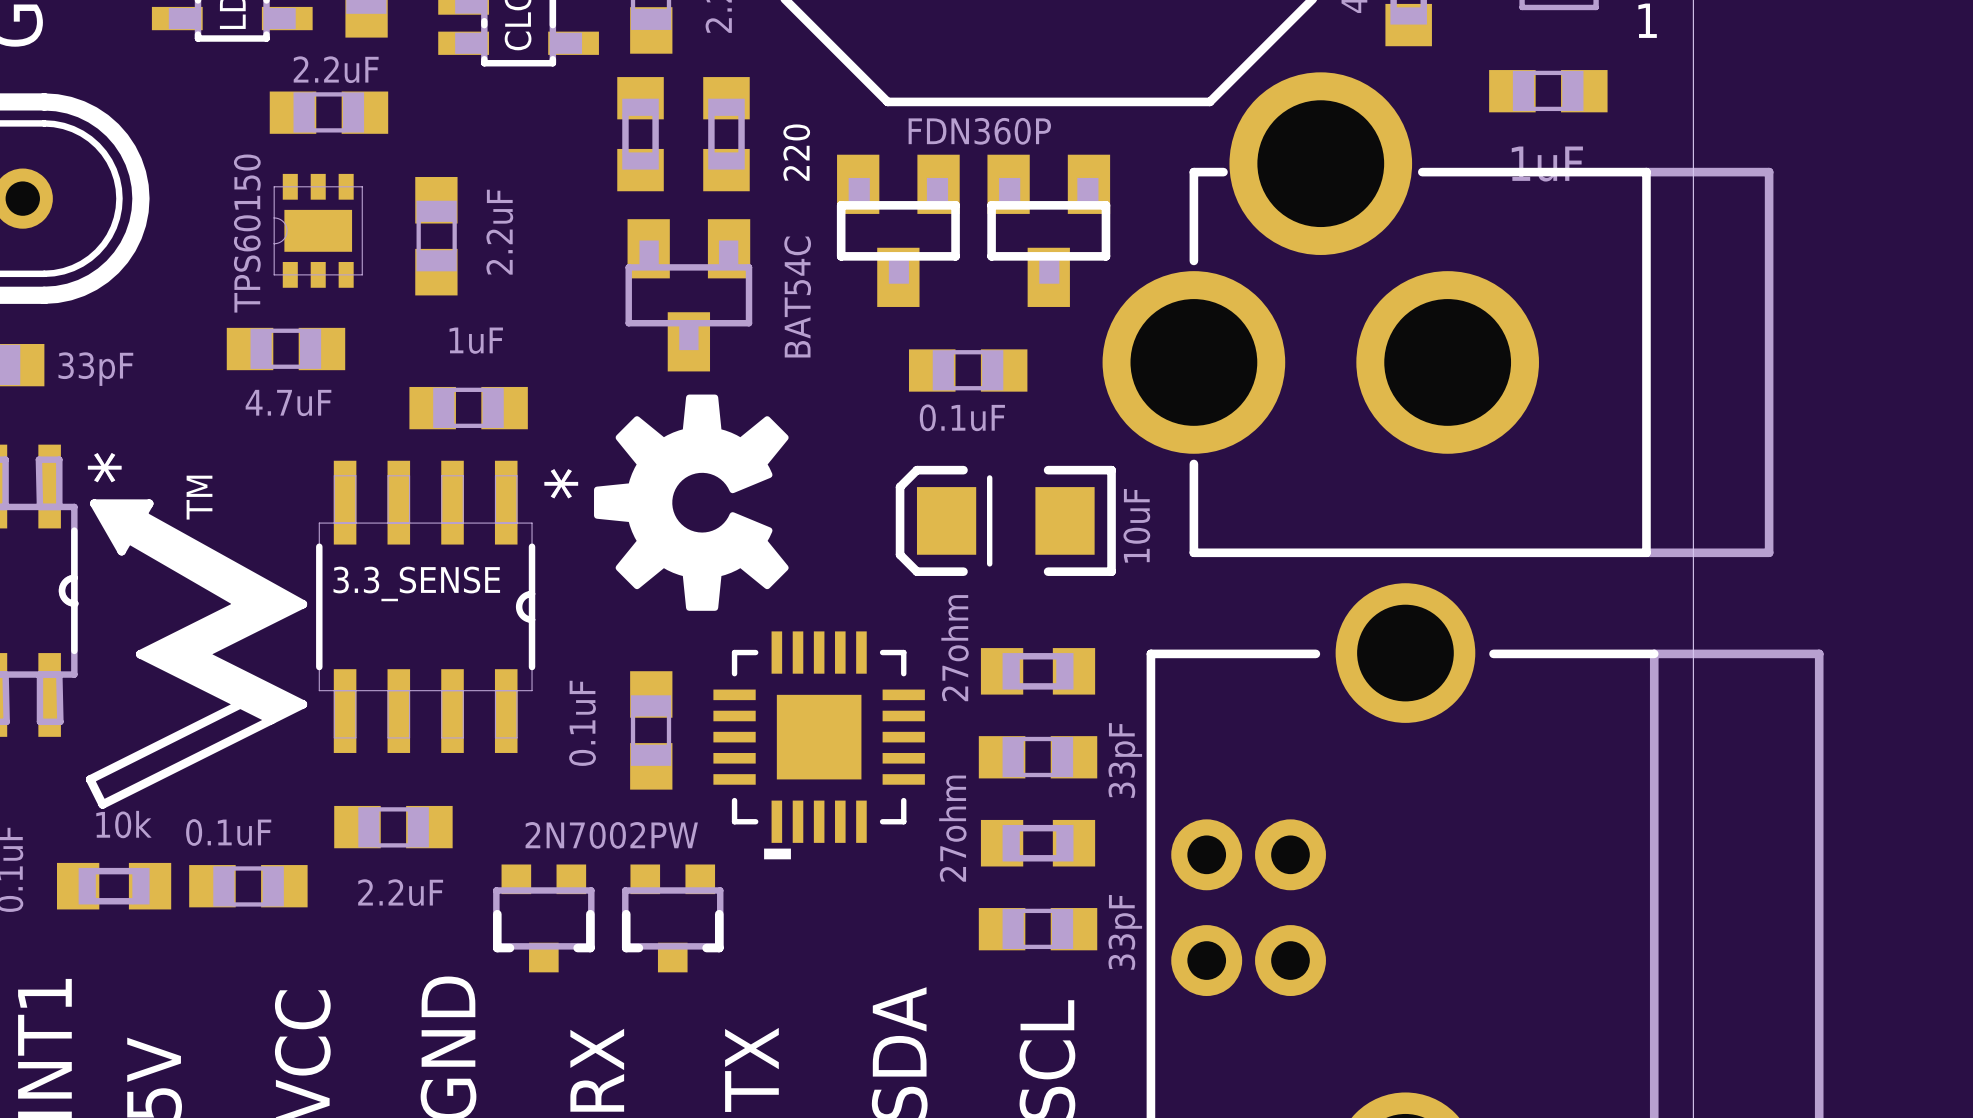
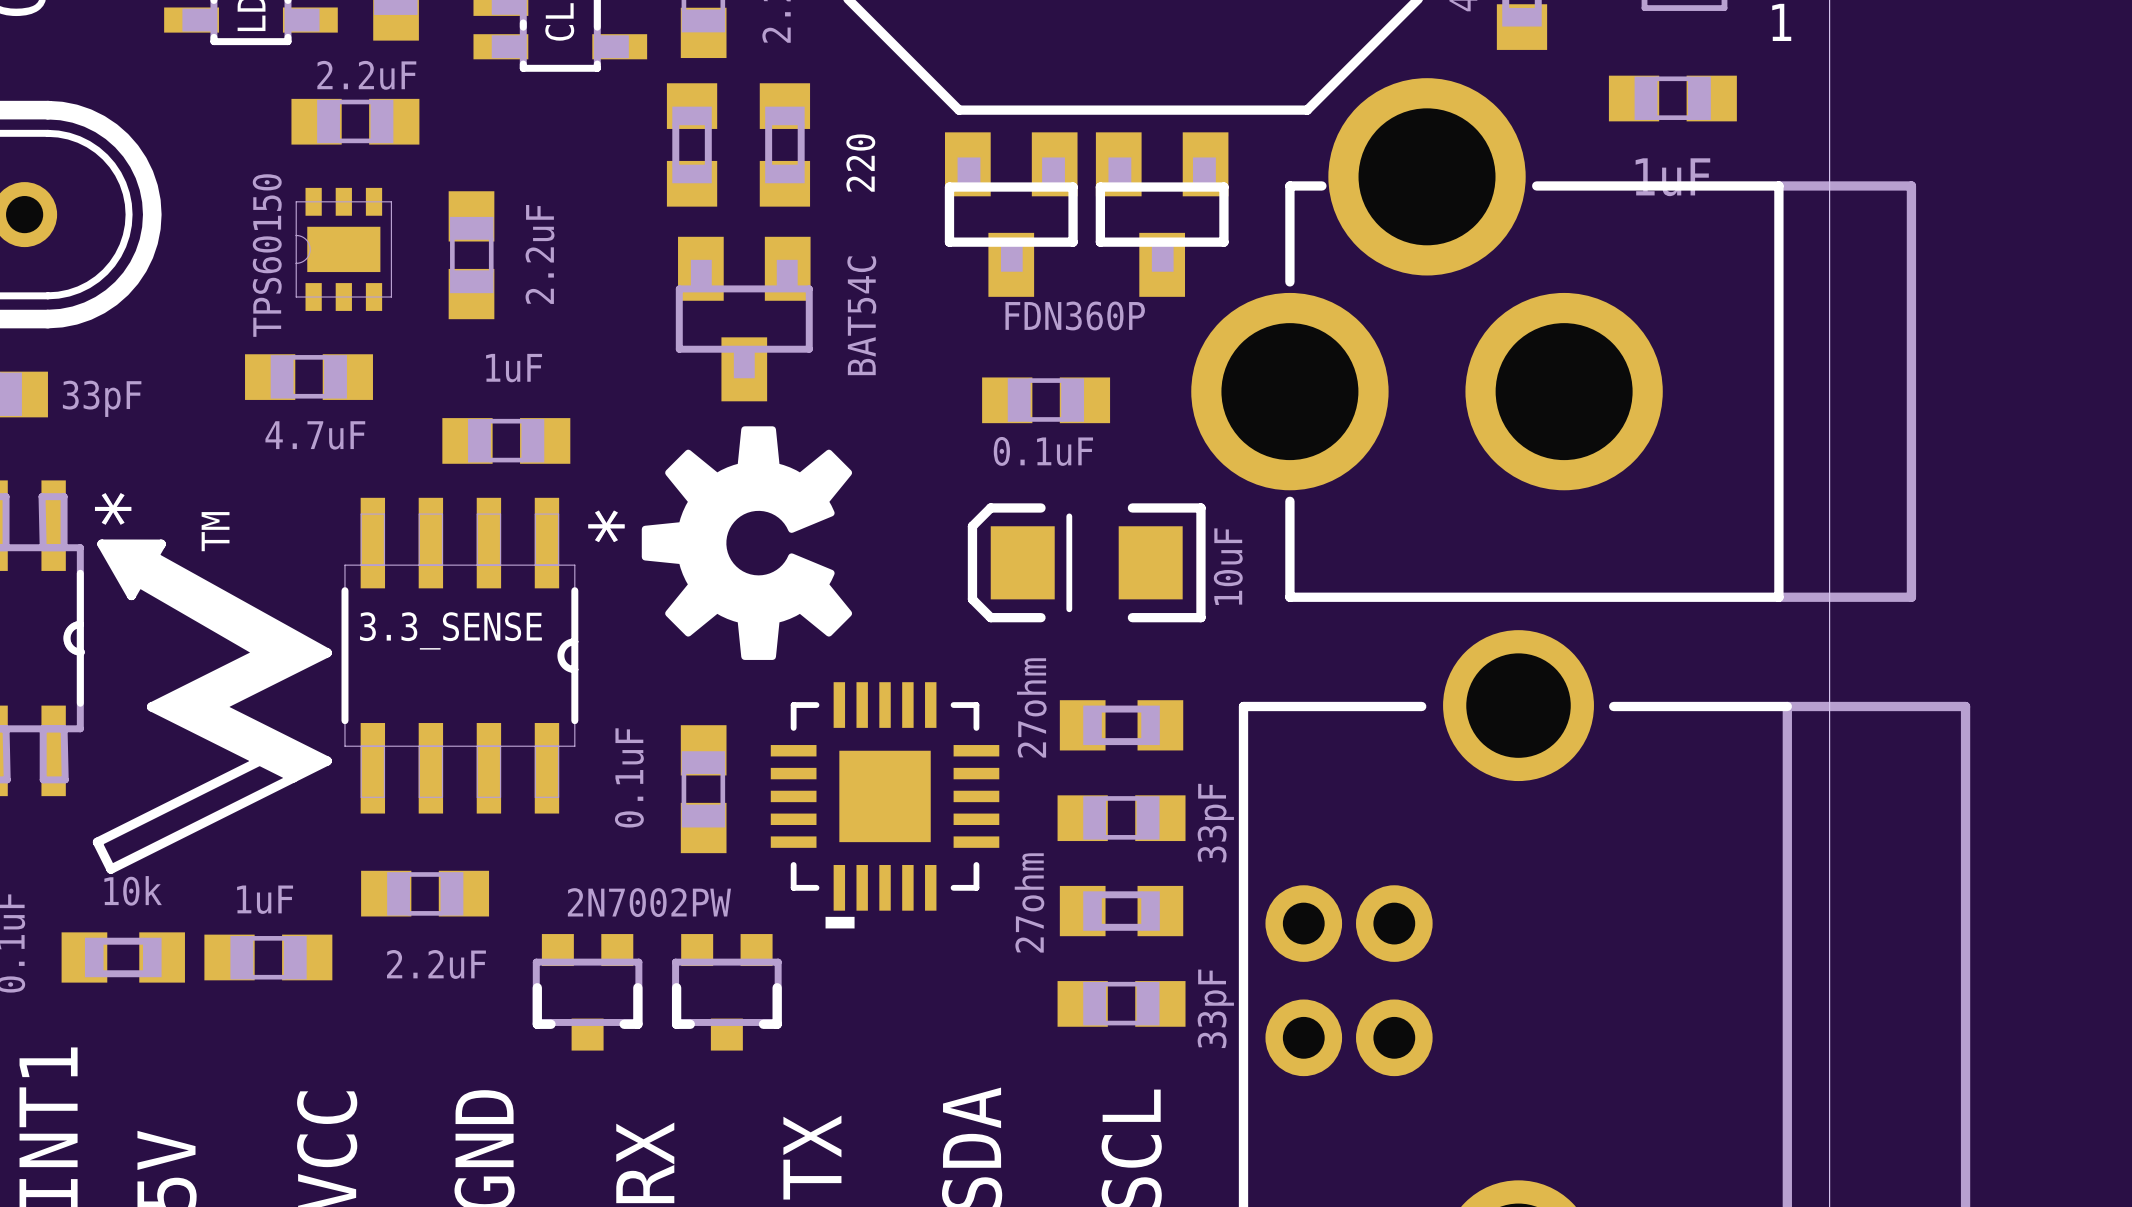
part value position: FDN360P (979, 131) -> FDN360P (1075, 315)
part position: (898, 230) -> (1011, 214)
part position: (1048, 230) -> (1162, 214)
part value: 0.1uF (228, 832) -> 1uF (265, 899)

